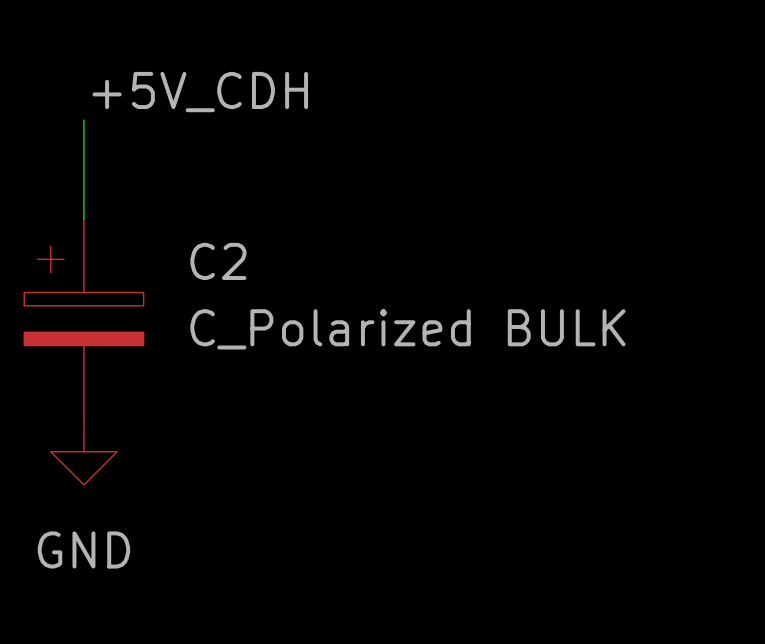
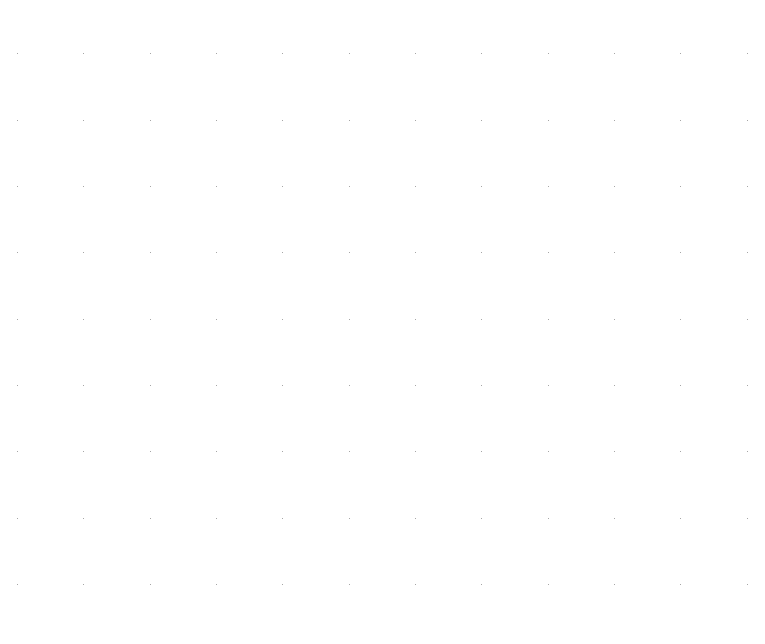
label: +5V_CDH (200, 92) -> none
wire: (83, 120) (83, 219) -> none
C2: C_Polarized BULK (83, 319) -> none
power symbol: GND (83, 451) -> none

